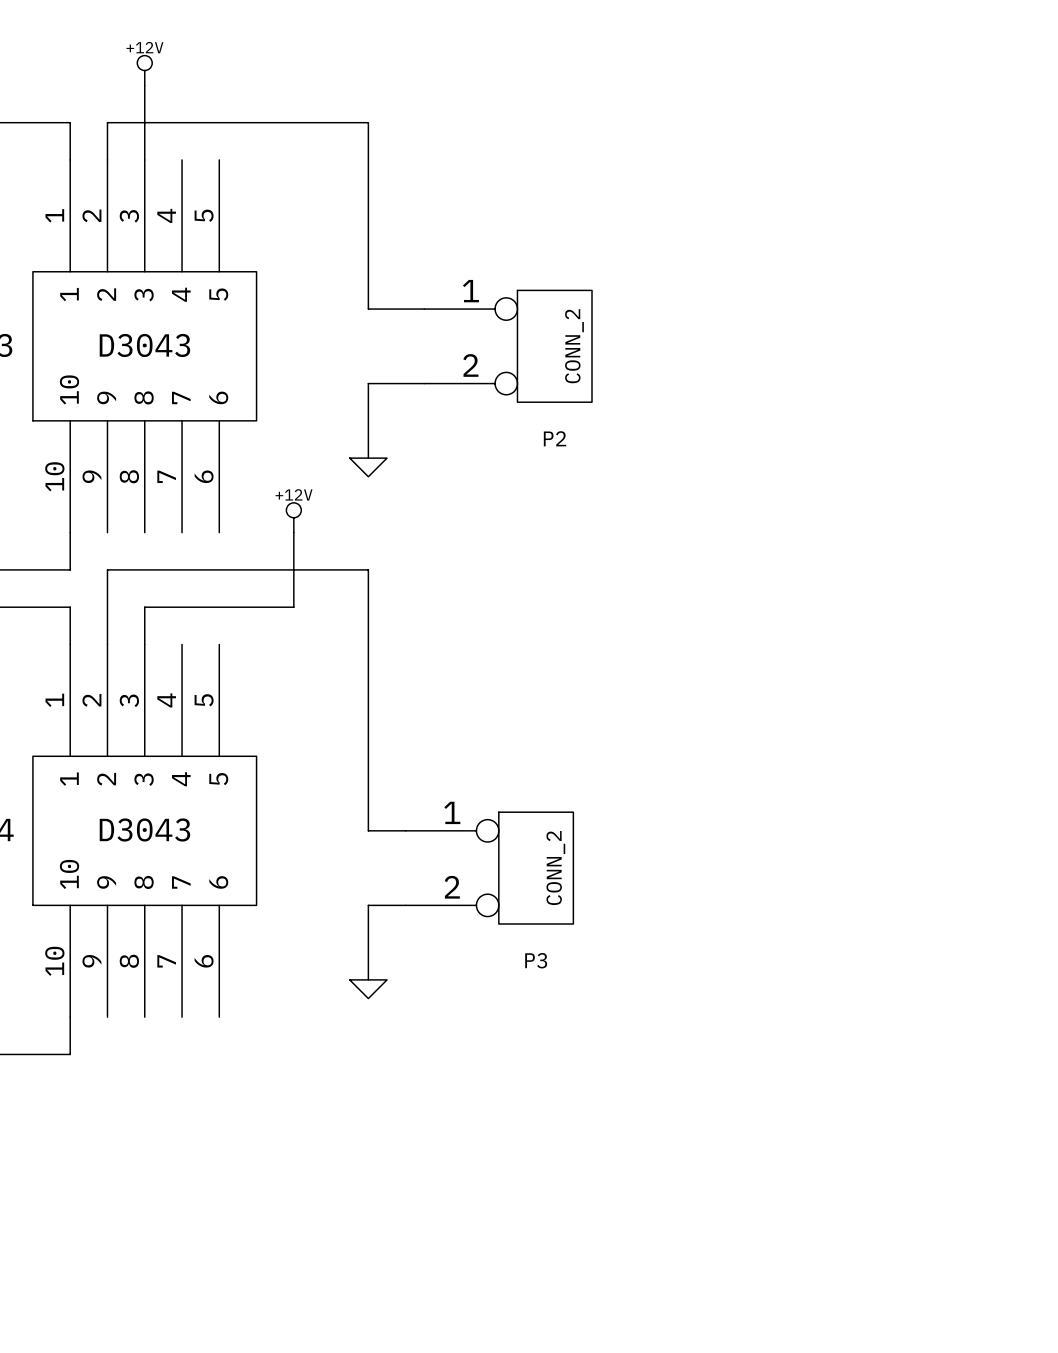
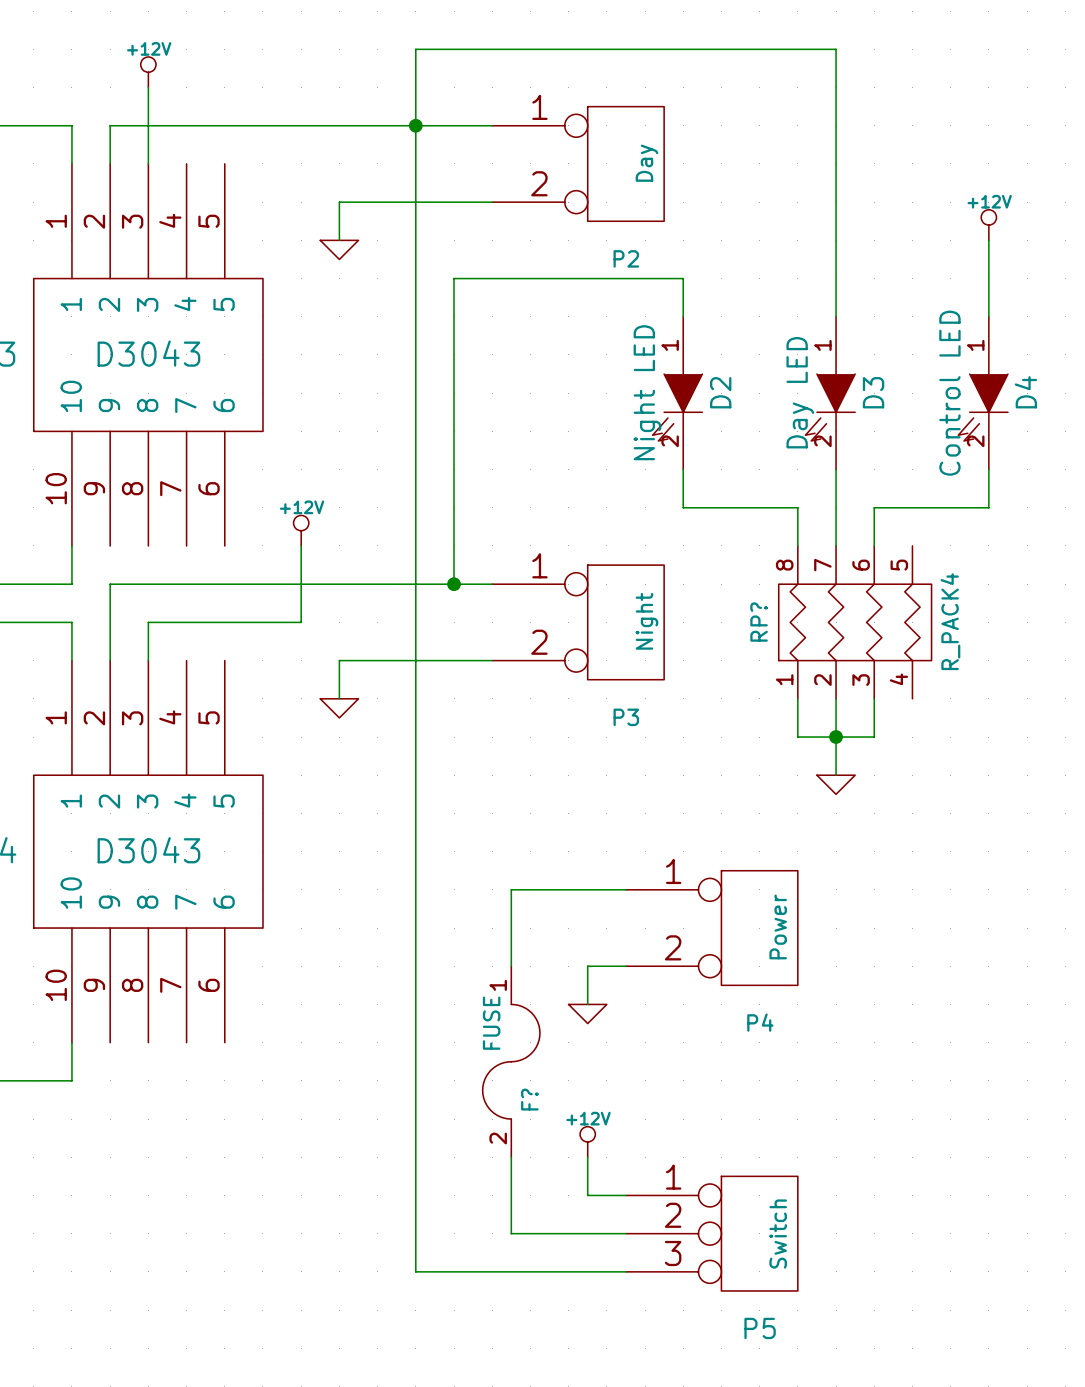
wire: (368, 122) (368, 309) (424, 309) -> (377, 125) (492, 125)
junction: none -> (415, 125)
wire: none -> (492, 202) (339, 202) (339, 240)
power symbol: none -> +12V (988, 225)
wire: none -> (988, 240) (988, 316)
power symbol: none -> (339, 249)
wire: none -> (683, 316) (683, 278) (454, 278) (454, 584)
wire: none -> (836, 316) (836, 49) (415, 49) (415, 1271) (625, 1271)
P2 position: (508, 346) -> (578, 163)
P2 value: CONN_2 (574, 346) -> Day (647, 163)
wire: (424, 383) (368, 383) (368, 458) -> none
D2: none -> Night LED (677, 393)
D3: none -> Day LED (830, 393)
D4: none -> Control LED (983, 393)
wire: none -> (683, 469) (683, 507) (797, 507) (797, 545)
wire: none -> (836, 469) (836, 545)
wire: none -> (988, 469) (988, 507) (874, 507) (874, 545)
power symbol: (368, 467) -> none
wire: (368, 569) (368, 830) (405, 830) -> (377, 584) (492, 584)
junction: none -> (454, 584)
RP?: none -> R_PACK4 (855, 622)
wire: none -> (492, 660) (339, 660) (339, 698)
wire: none -> (797, 698) (797, 737) (874, 737) (874, 698)
wire: none -> (836, 698) (836, 775)
power symbol: none -> (339, 708)
junction: none -> (836, 737)
power symbol: none -> (836, 784)
P3 position: (489, 868) -> (578, 622)
P3 value: CONN_2 (555, 868) -> Night (647, 621)
wire: none -> (625, 889) (511, 889) (511, 966)
wire: (405, 905) (368, 905) (368, 979) -> none
P4: none -> Power (711, 928)
wire: none -> (625, 966) (587, 966) (587, 1004)
power symbol: (368, 989) -> none
power symbol: none -> (587, 1013)
F?: none -> FUSE (511, 1061)
power symbol: none -> +12V (587, 1141)
wire: none -> (511, 1157) (511, 1233) (625, 1233)
wire: none -> (587, 1157) (587, 1195) (625, 1195)
P5: none -> Switch (711, 1233)

